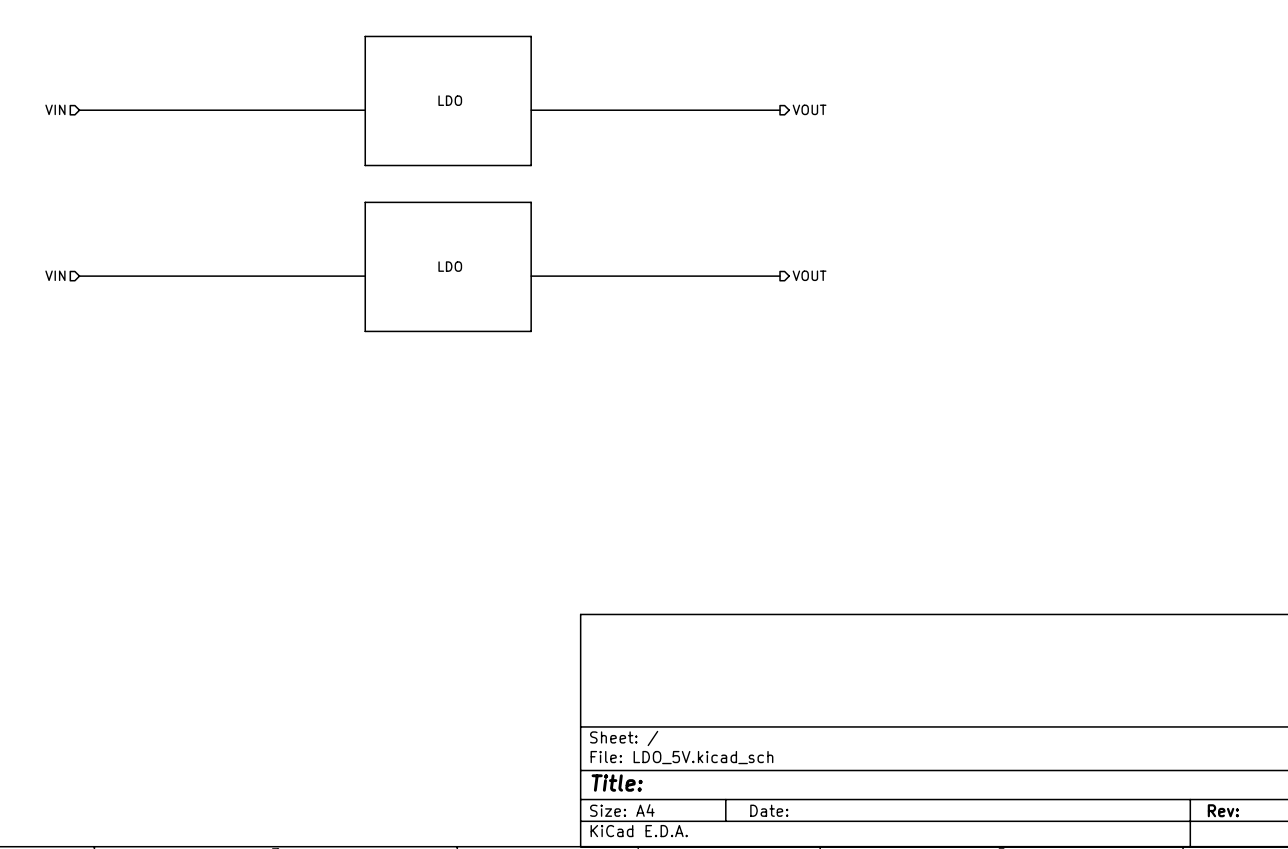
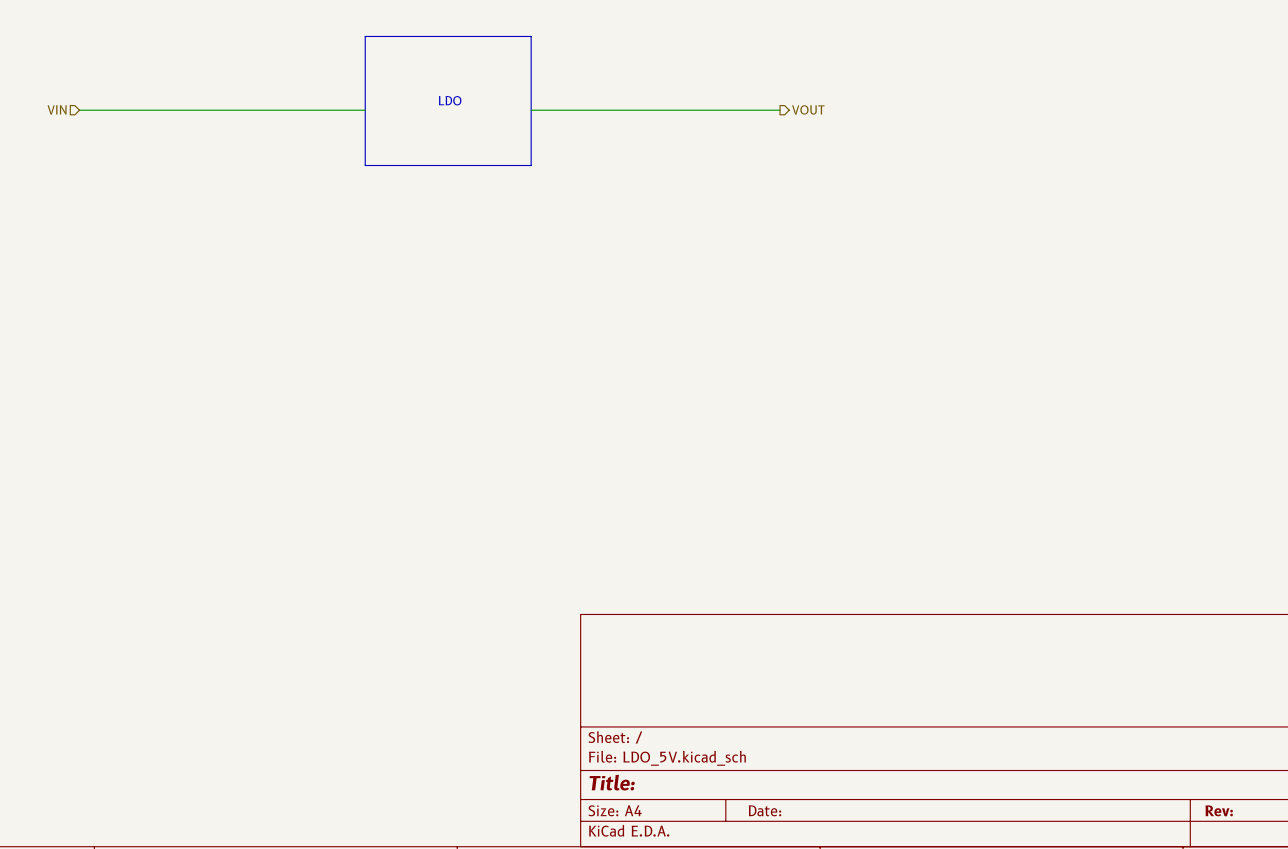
line: (365, 202) (531, 202) (531, 331) (365, 331) (365, 202) -> none
text: LDO (450, 266) -> none
hierarchical label: VIN (55, 275) -> none
hierarchical label: VOUT (809, 275) -> none
wire: (79, 276) (365, 276) -> none
wire: (531, 276) (780, 276) -> none

